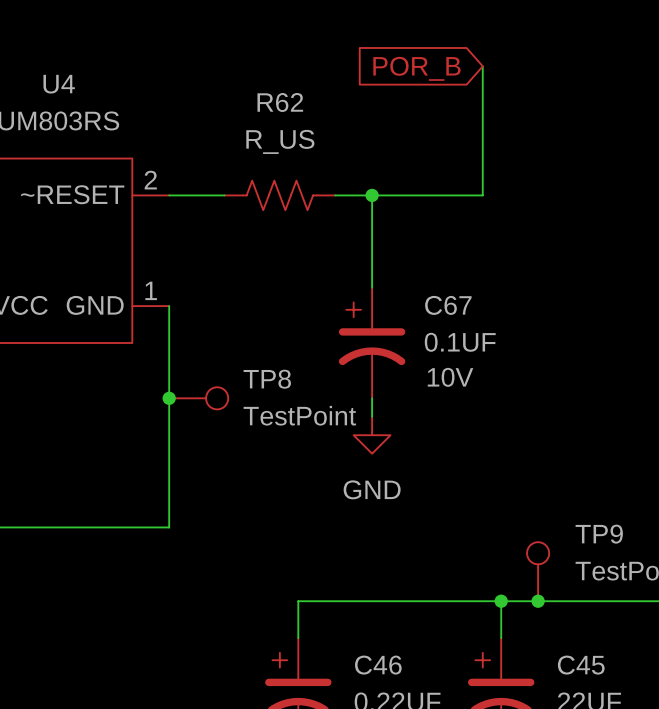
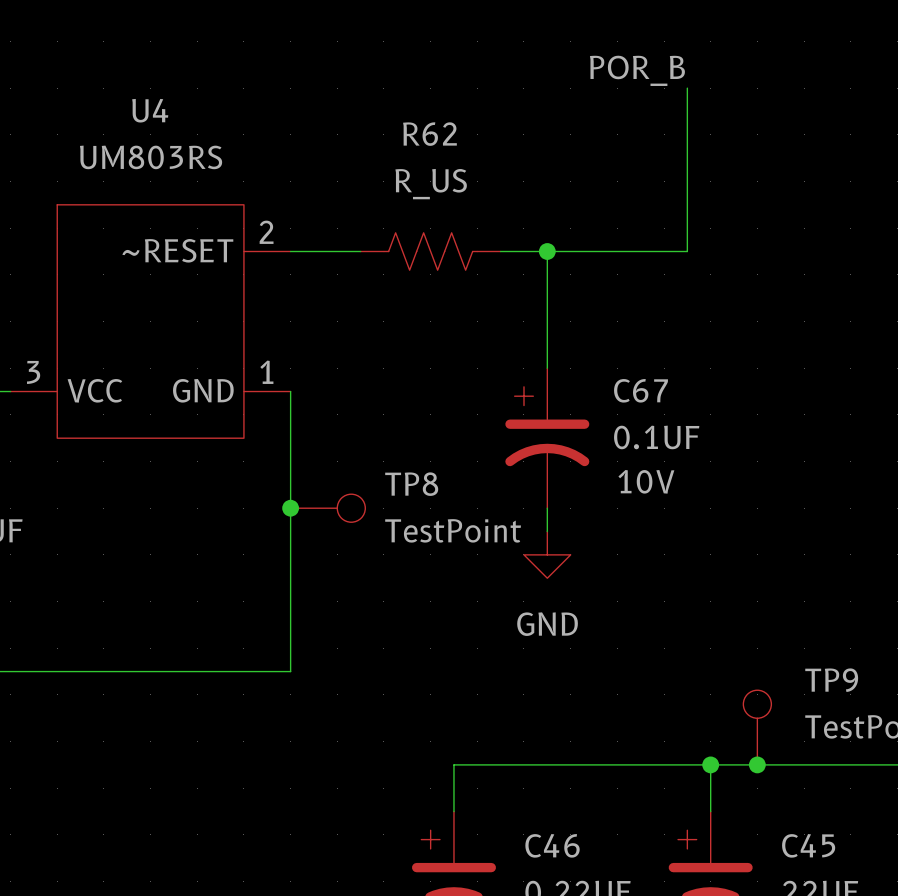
label: none -> POR_B (637, 70)
global label: POR_B (416, 68) -> none

